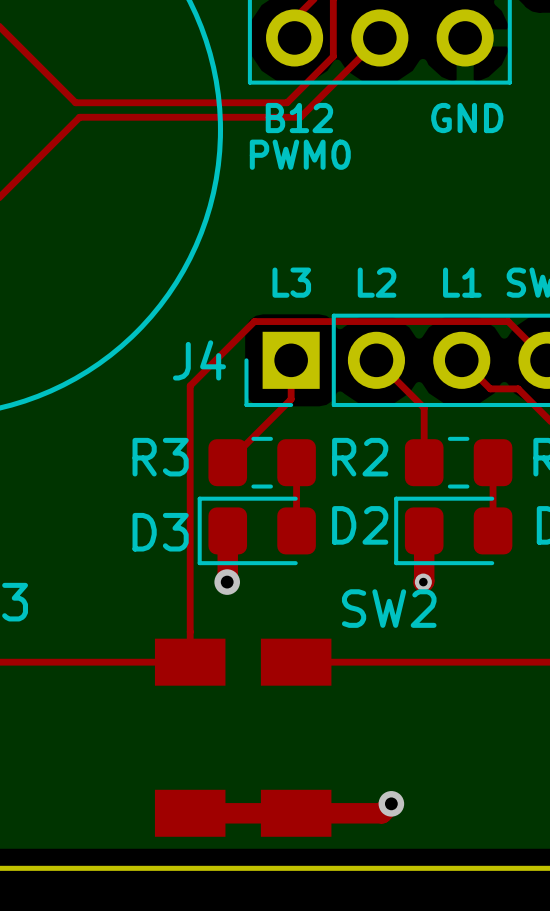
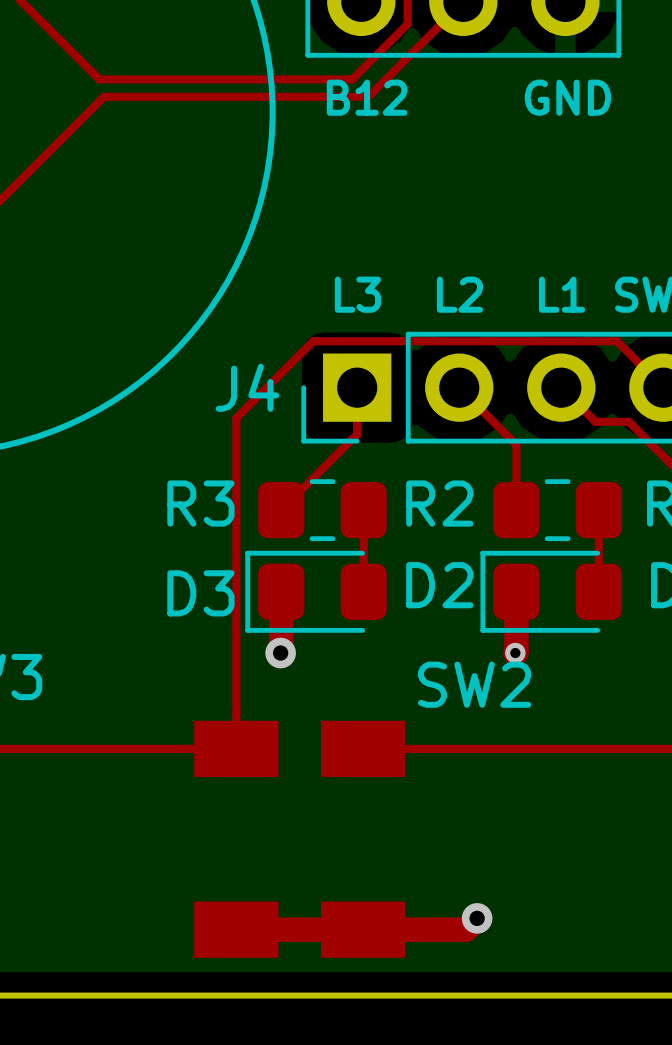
text: PWM0 (300, 154) -> none

